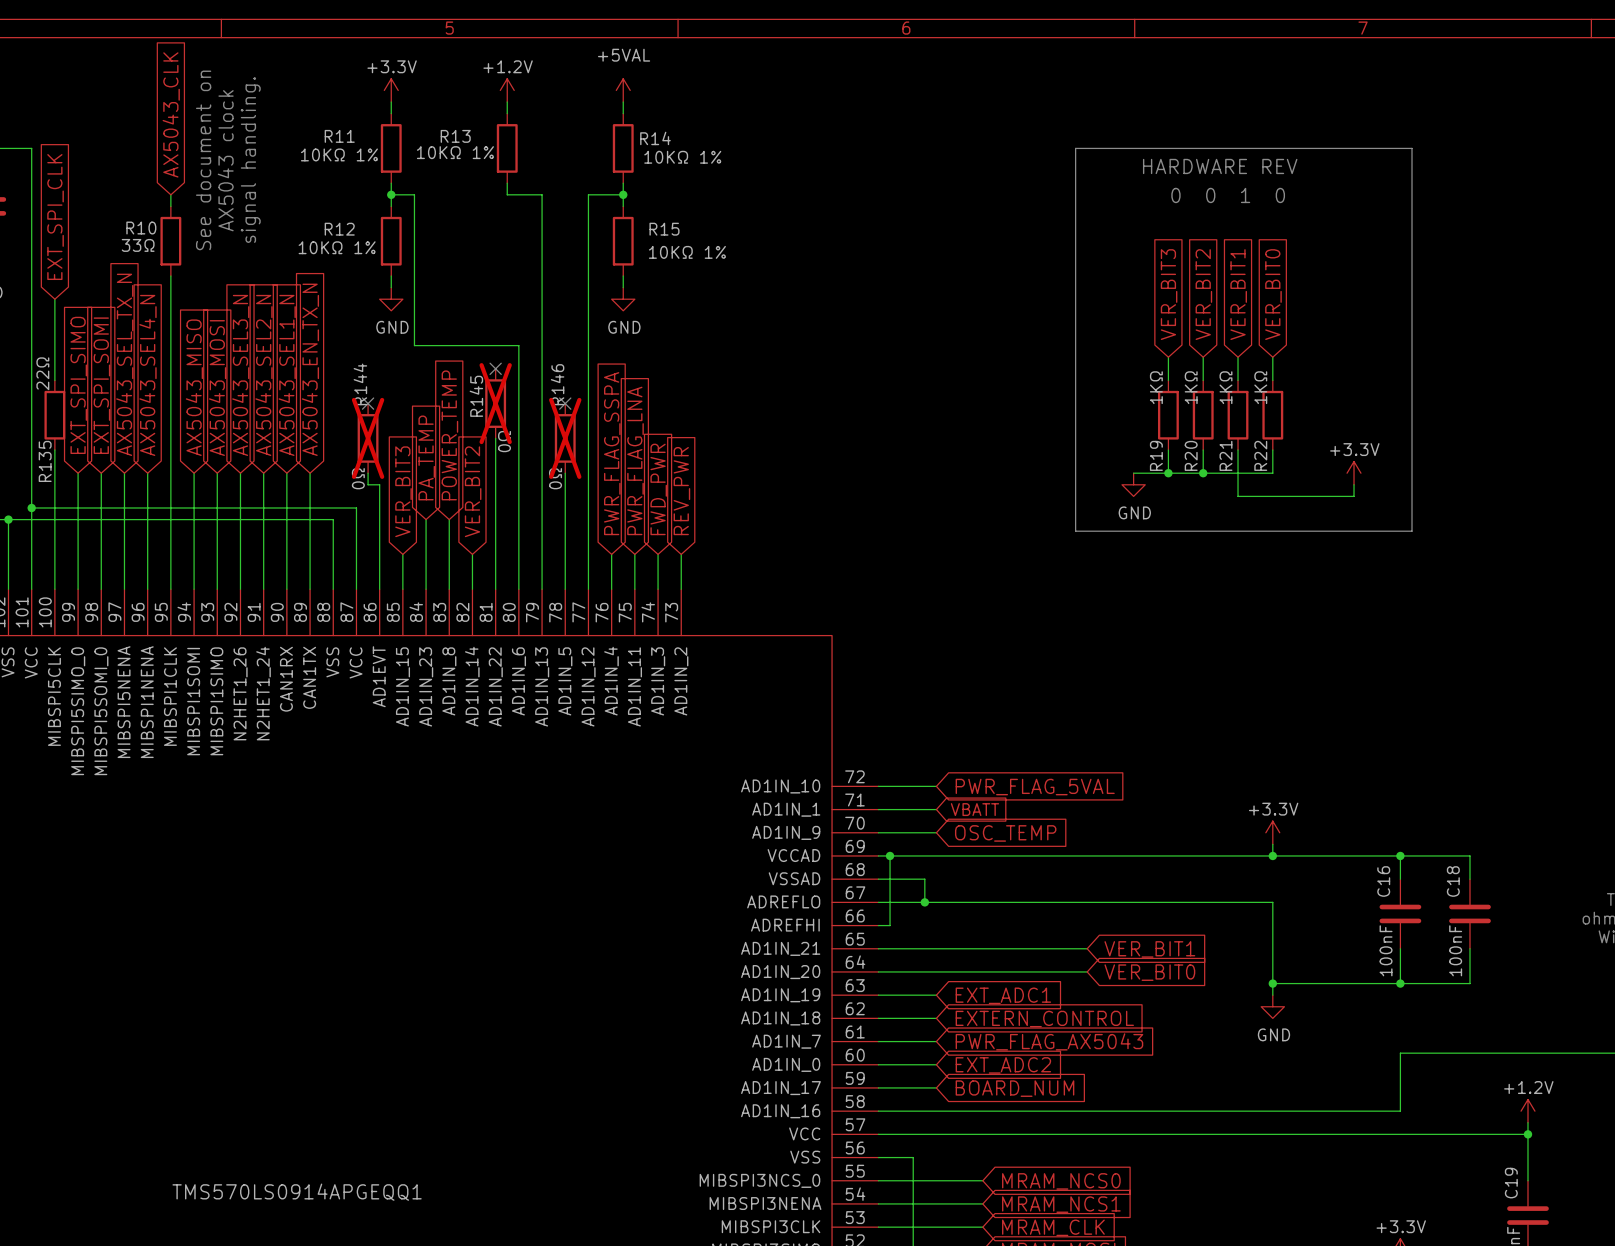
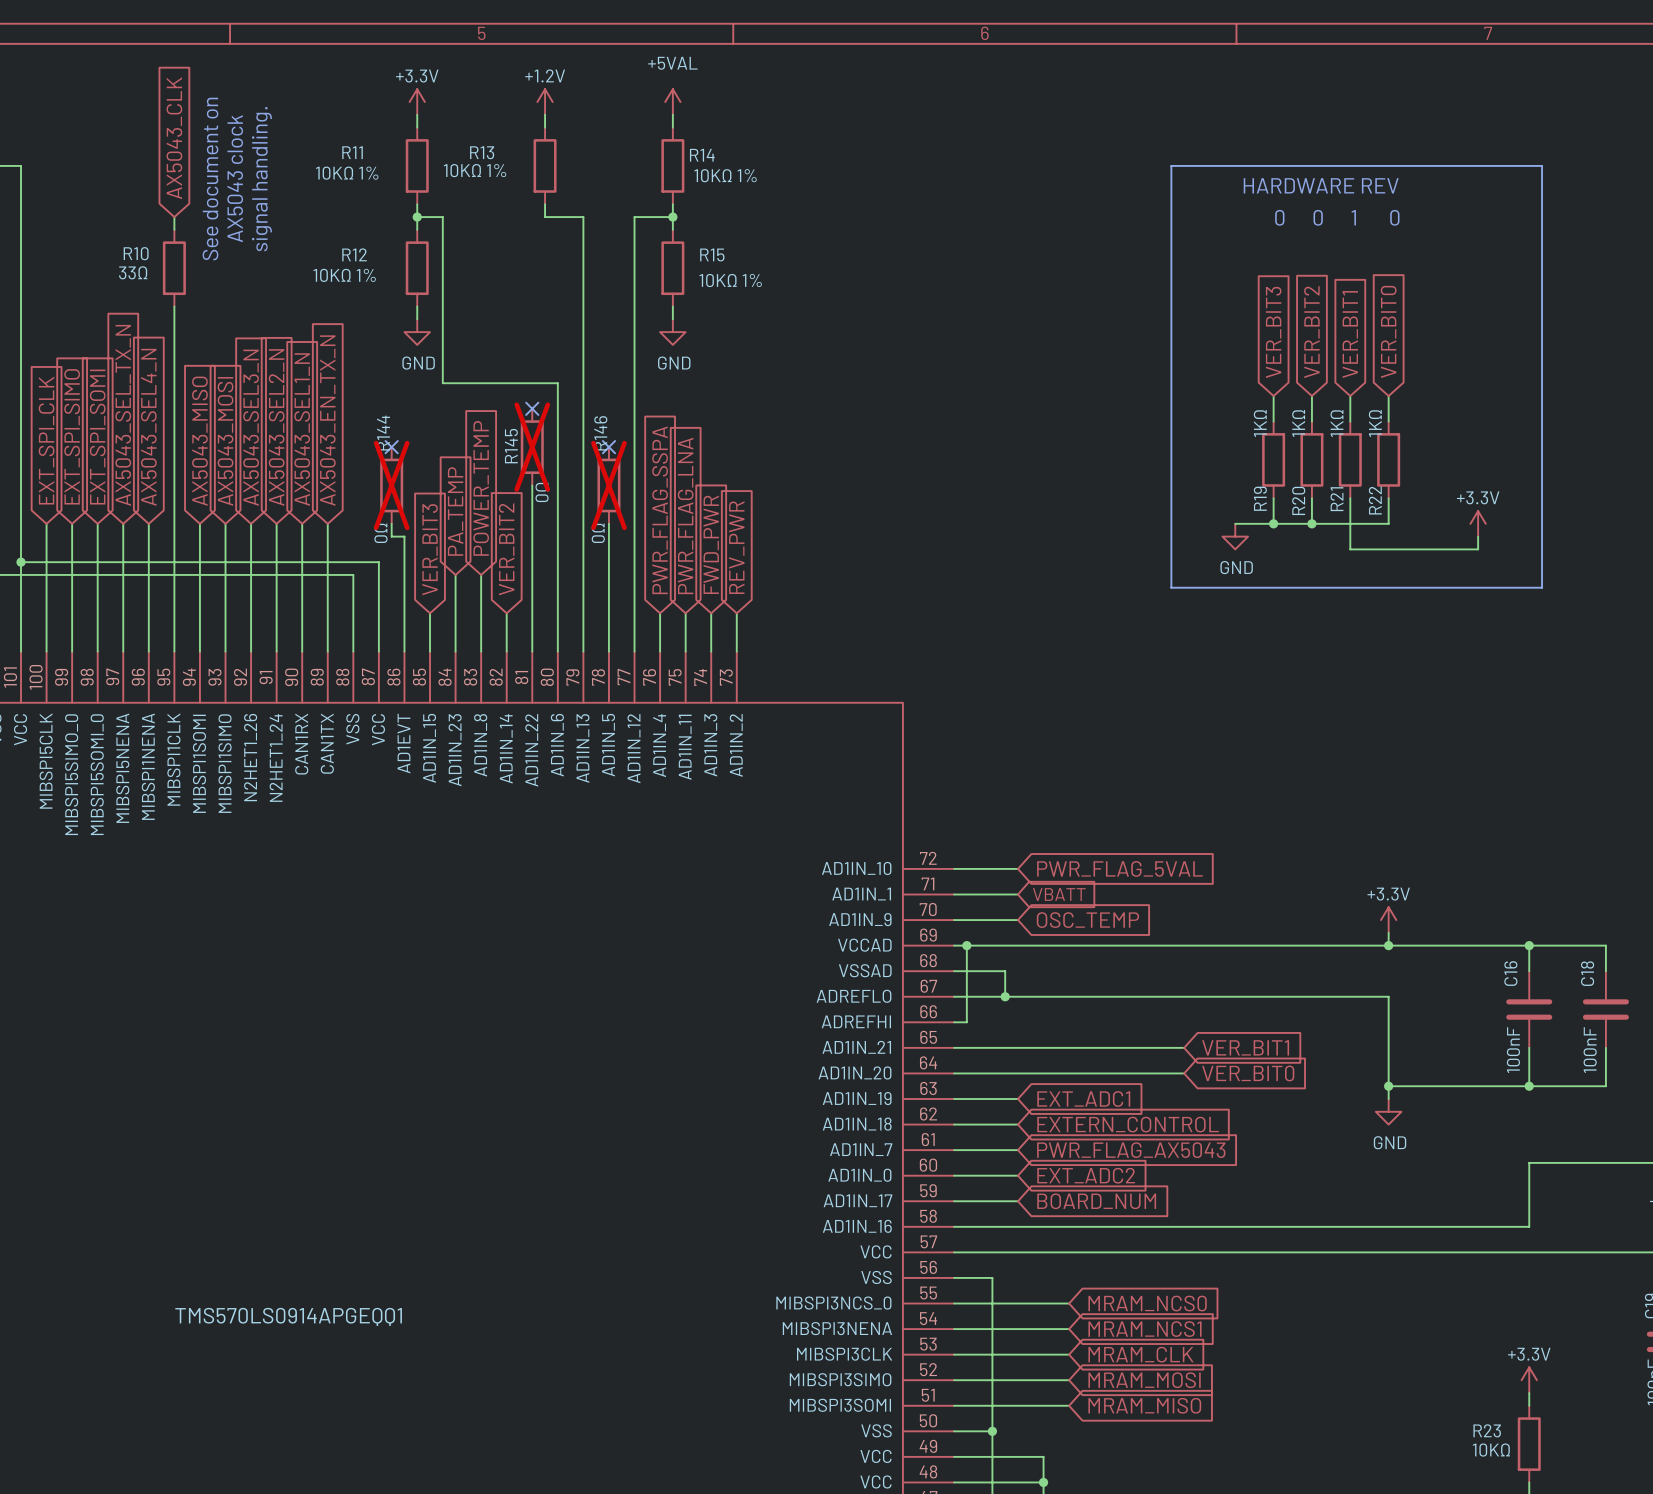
global label position: EXT_SPI_CLK (55, 217) -> EXT_SPI_CLK (46, 440)
wire: (54, 299) (54, 380) -> none
R135: 22Ω (54, 415) -> none
wire: (54, 450) (54, 473) -> none

